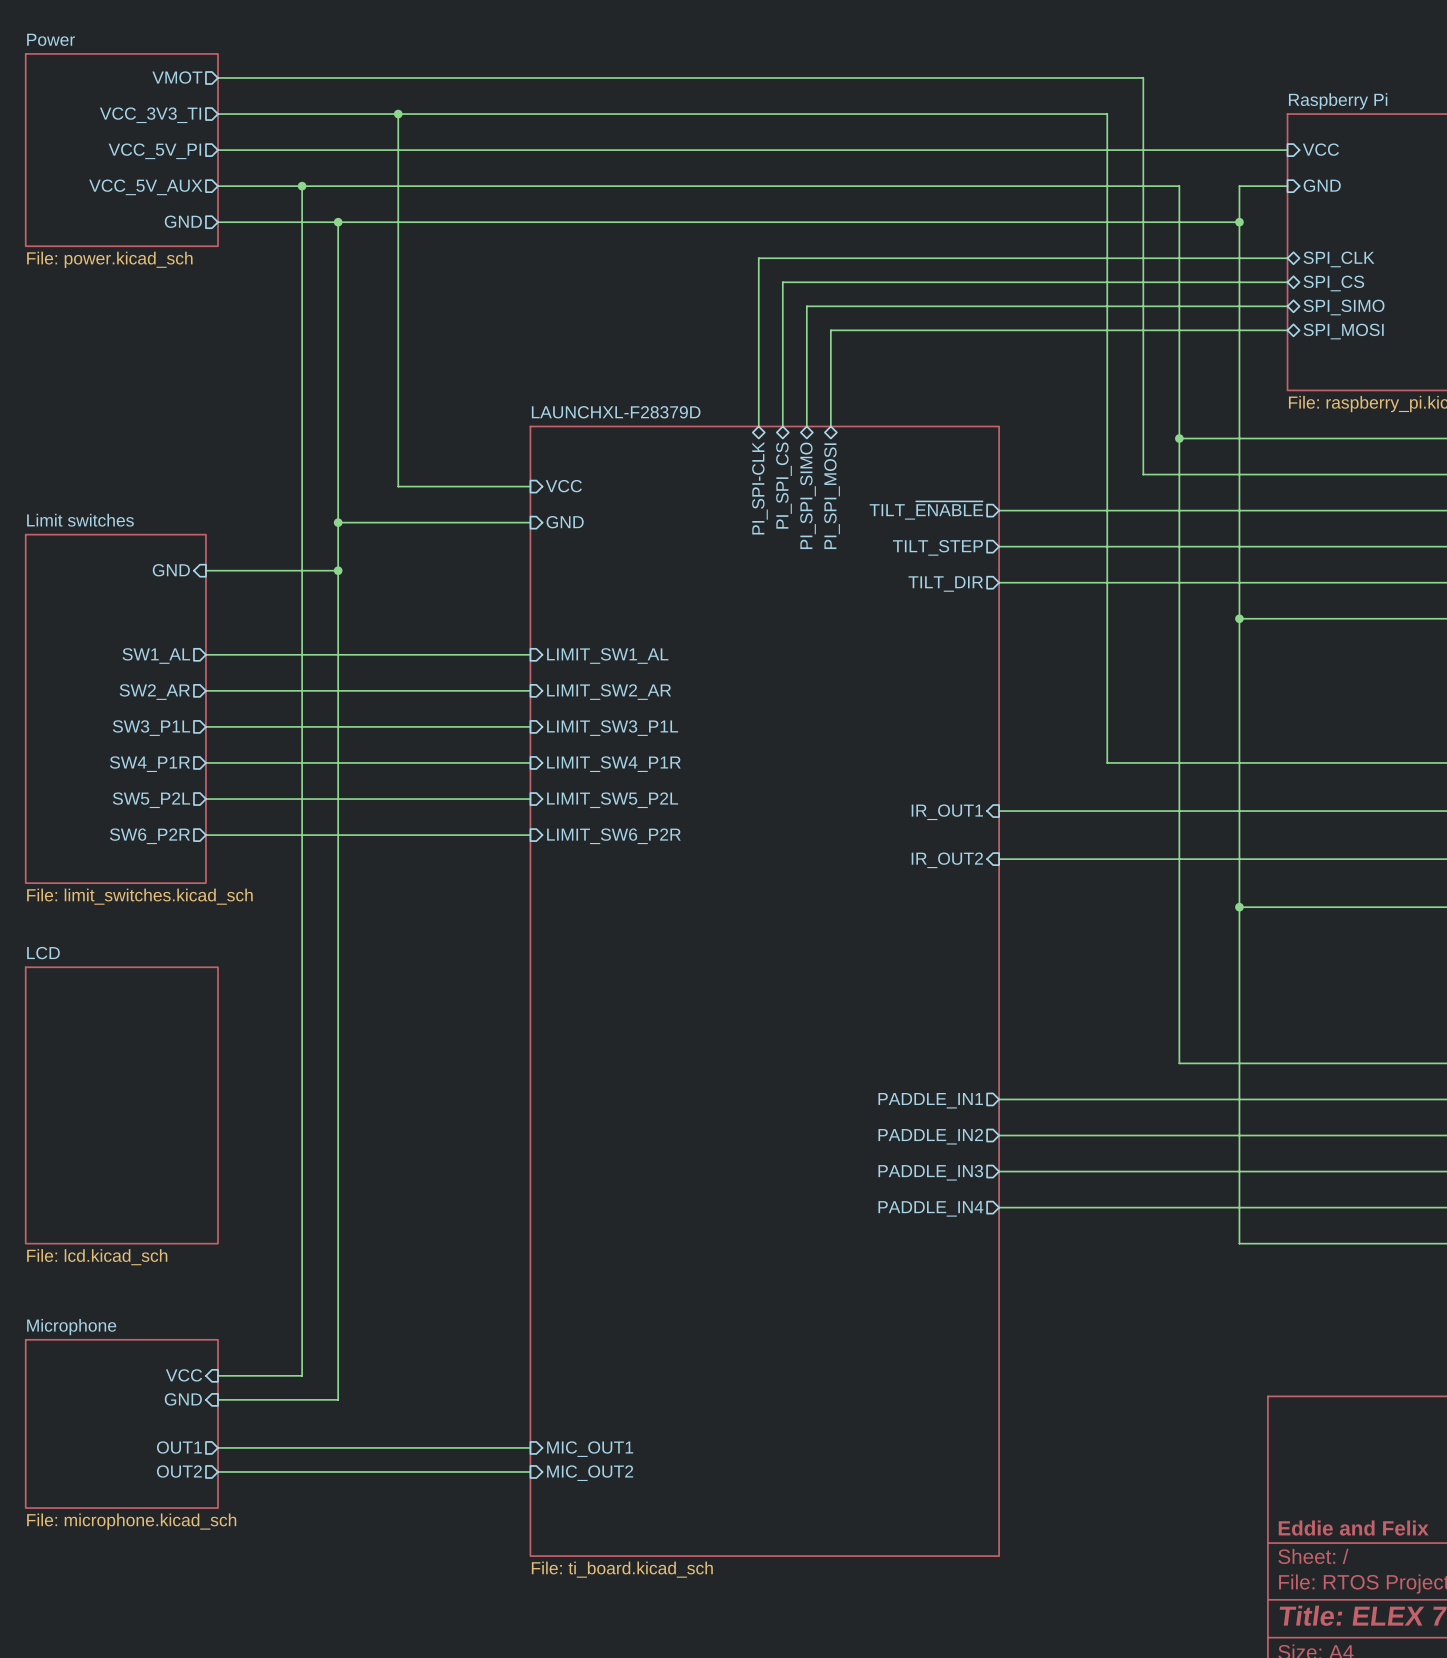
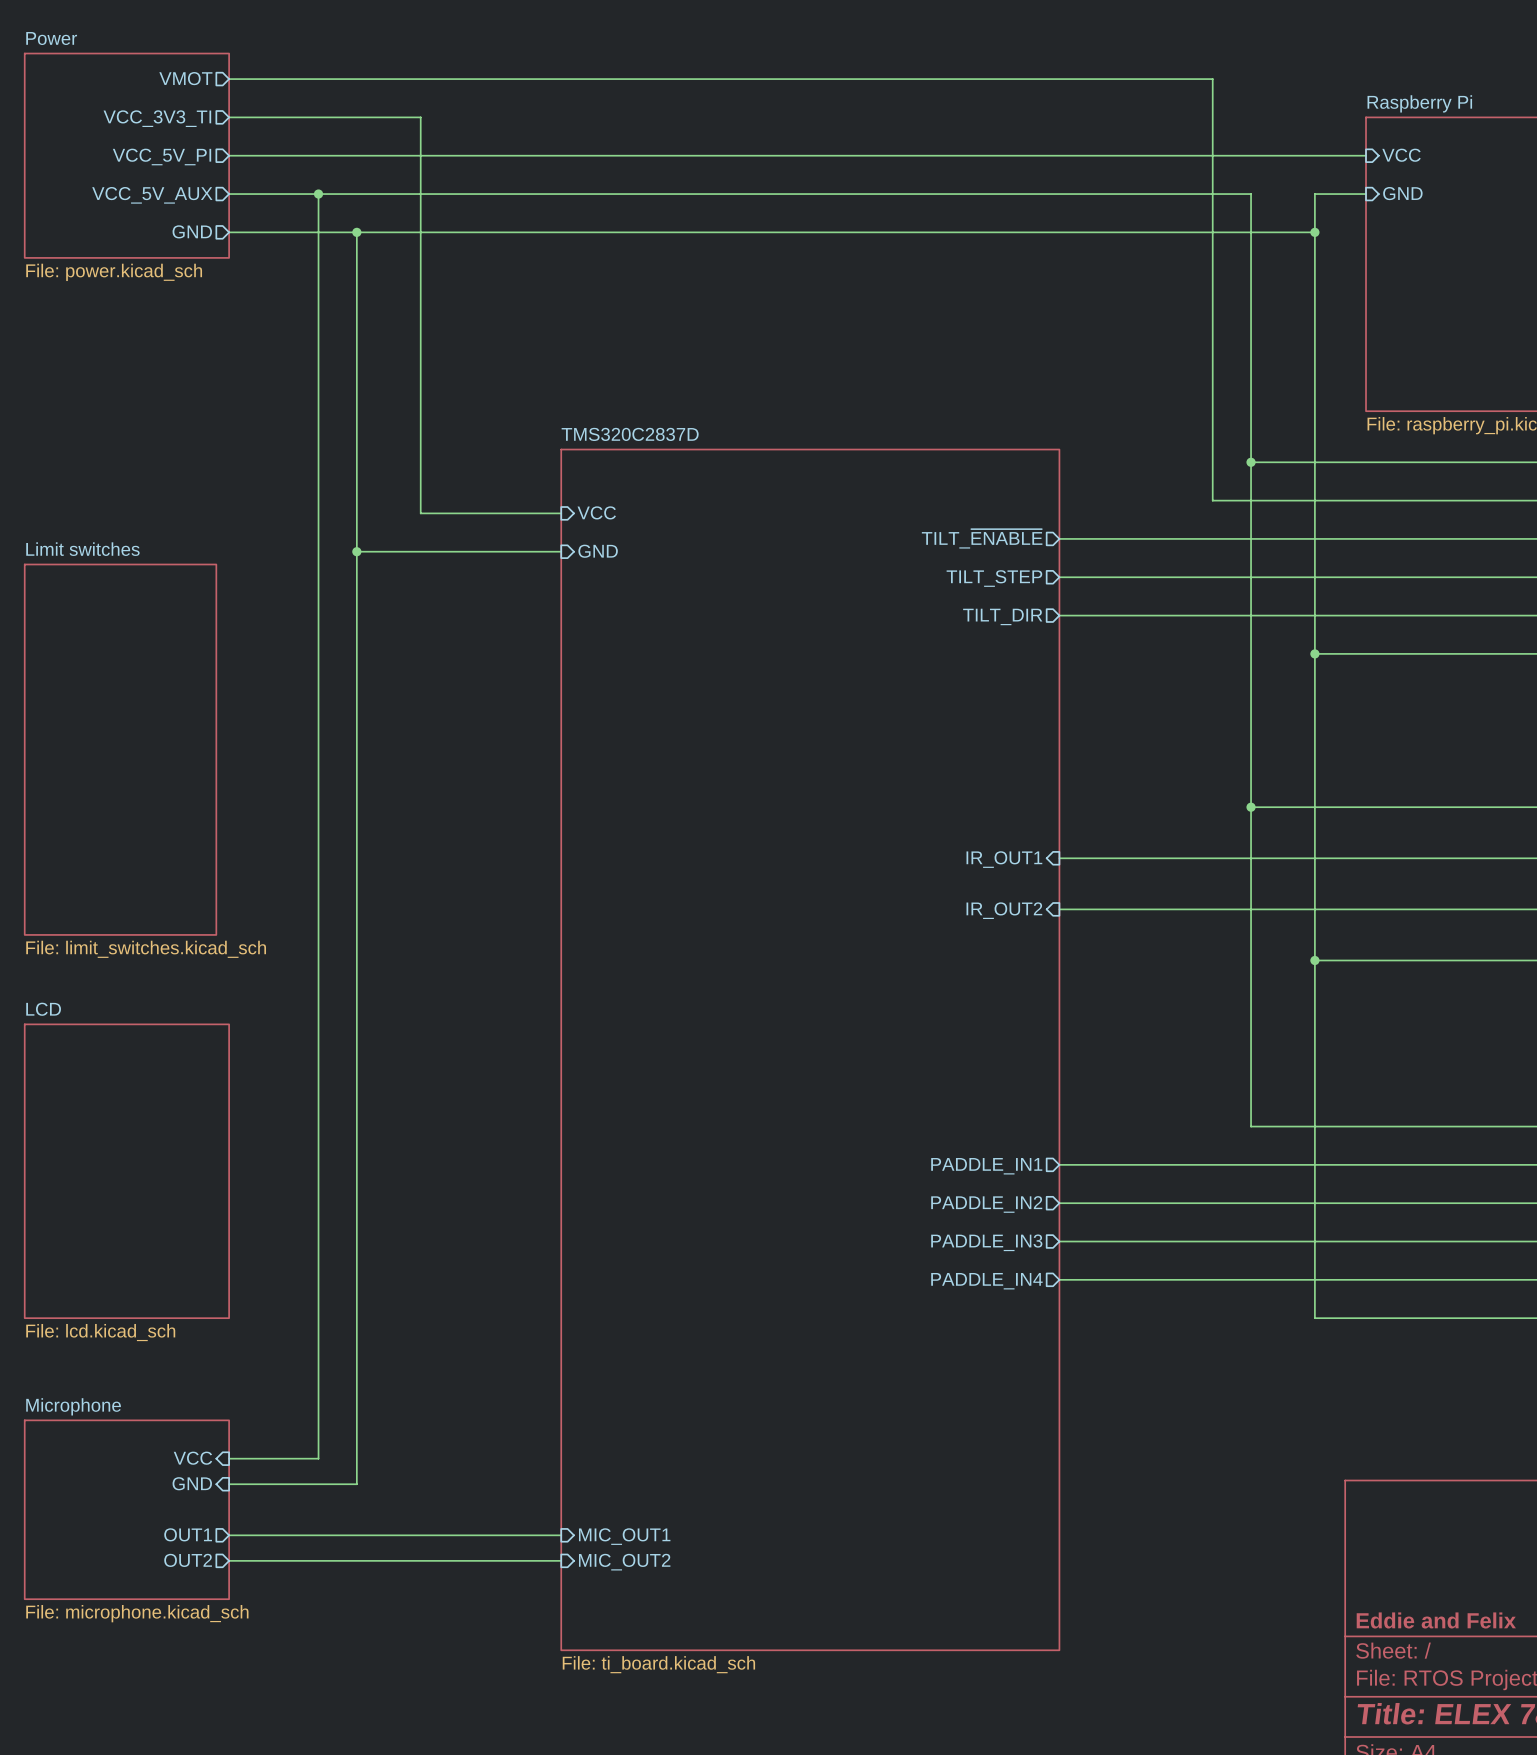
wire: (398, 114) (1107, 114) (1107, 762) (1179, 762) -> none
junction: (398, 114) -> none
wire: (1287, 258) (758, 258) (758, 426) -> none
sheet pin: SPI_CLK (1339, 259) -> none
wire: (1287, 282) (782, 282) (782, 426) -> none
sheet pin: SPI_CS (1333, 283) -> none
wire: (1287, 306) (806, 306) (806, 426) -> none
sheet pin: SPI_SIMO (1344, 307) -> none
wire: (1287, 330) (830, 330) (830, 426) -> none
sheet pin: SPI_MOSI (1343, 331) -> none
sheet LAUNCHXL-F28379D name: LAUNCHXL-F28379D (616, 412) -> TMS320C2837D (630, 434)
sheet pin: PI_SPI_CS (783, 485) -> none
sheet pin: PI_SPI-CLK (759, 488) -> none
sheet pin: PI_SPI_SIMO (808, 495) -> none
sheet pin: PI_SPI_MOSI (832, 496) -> none
sheet pin: GND (171, 570) -> none
wire: (205, 570) (338, 570) -> none
junction: (338, 570) -> none
wire: (205, 654) (530, 654) -> none
sheet pin: SW1_AL (156, 656) -> none
sheet pin: LIMIT_SW1_AL (607, 656) -> none
wire: (205, 690) (530, 690) -> none
sheet pin: SW2_AR (154, 692) -> none
sheet pin: LIMIT_SW2_AR (609, 692) -> none
wire: (205, 726) (530, 726) -> none
sheet pin: SW3_P1L (151, 728) -> none
sheet pin: LIMIT_SW3_P1L (612, 728) -> none
wire: (205, 762) (530, 762) -> none
junction: none -> (1251, 807)
sheet pin: SW4_P1R (149, 764) -> none
sheet pin: LIMIT_SW4_P1R (613, 764) -> none
wire: (205, 799) (530, 799) -> none
sheet pin: SW5_P2L (151, 800) -> none
sheet pin: LIMIT_SW5_P2L (612, 800) -> none
wire: (205, 835) (530, 835) -> none
sheet pin: SW6_P2R (149, 836) -> none
sheet pin: LIMIT_SW6_P2R (613, 836) -> none

